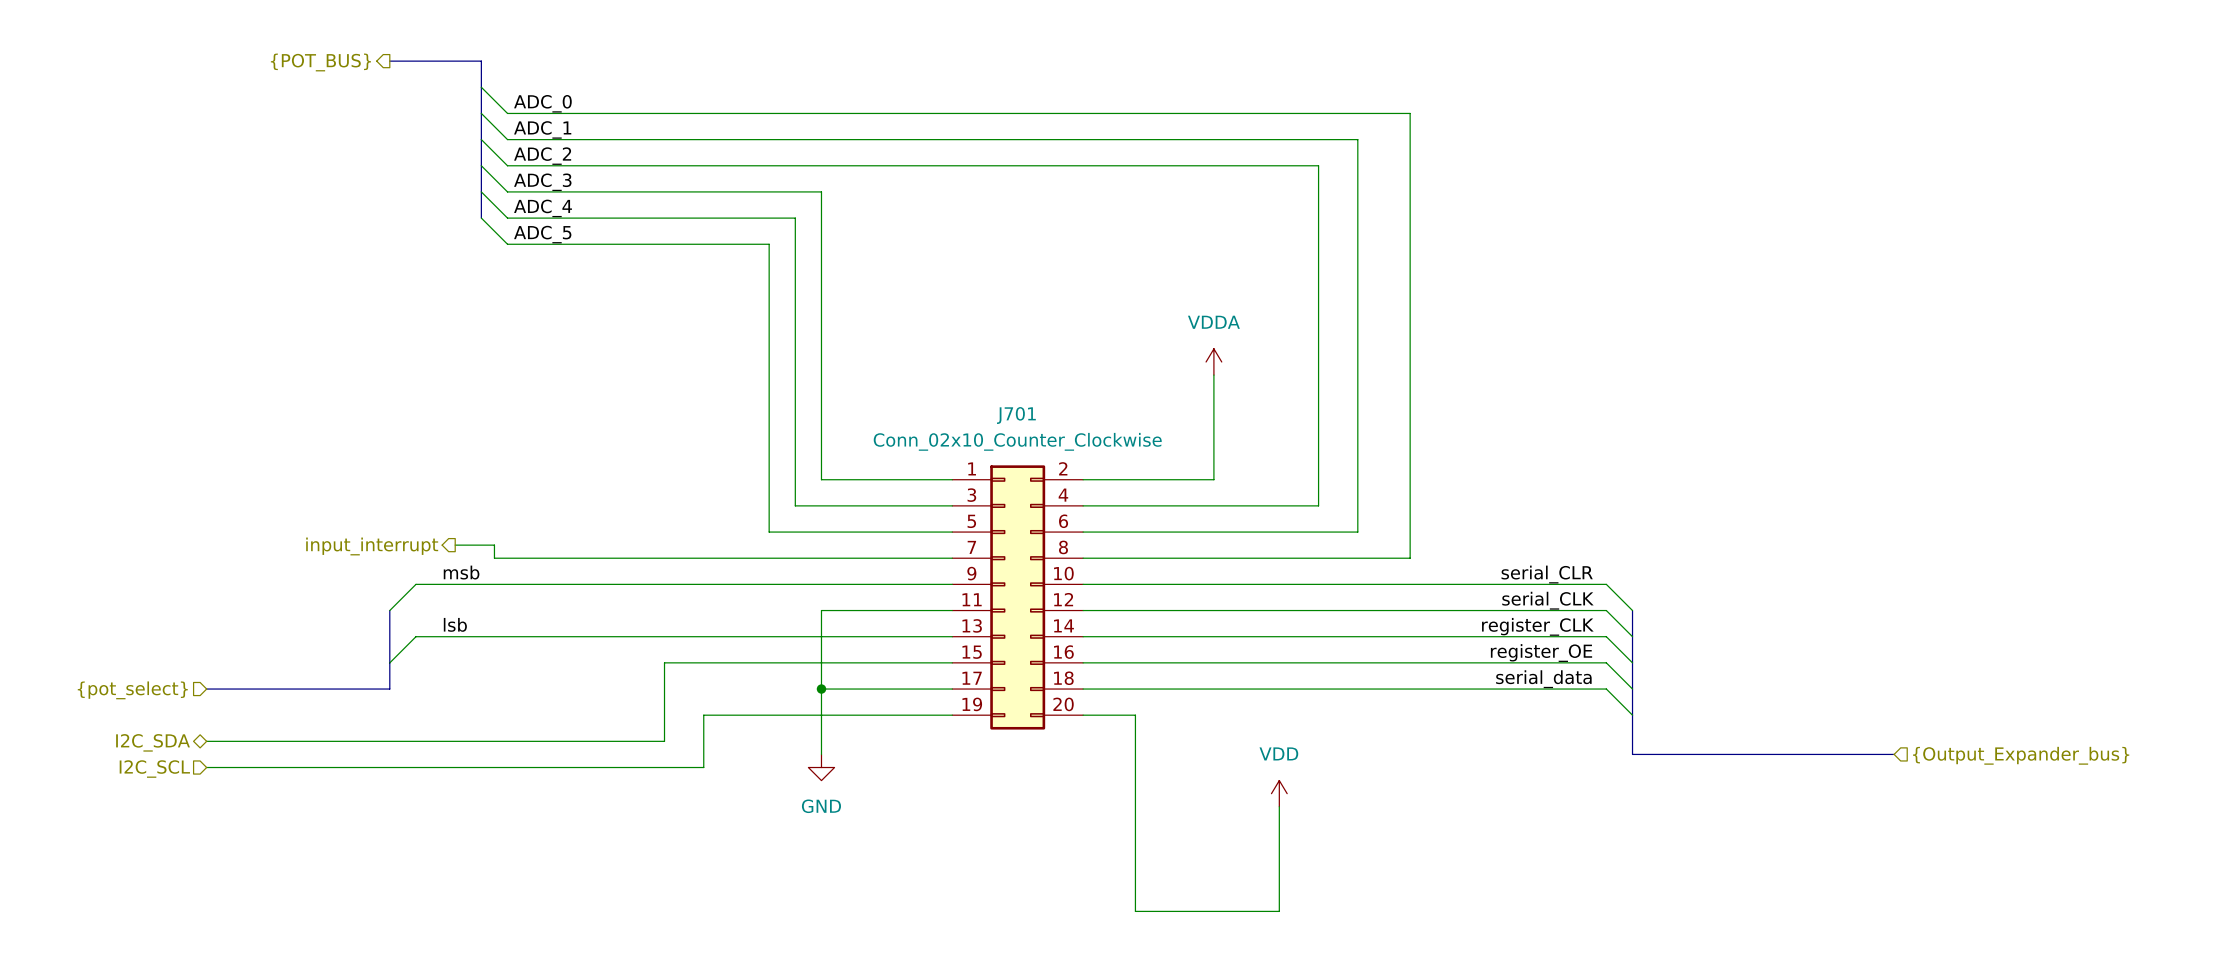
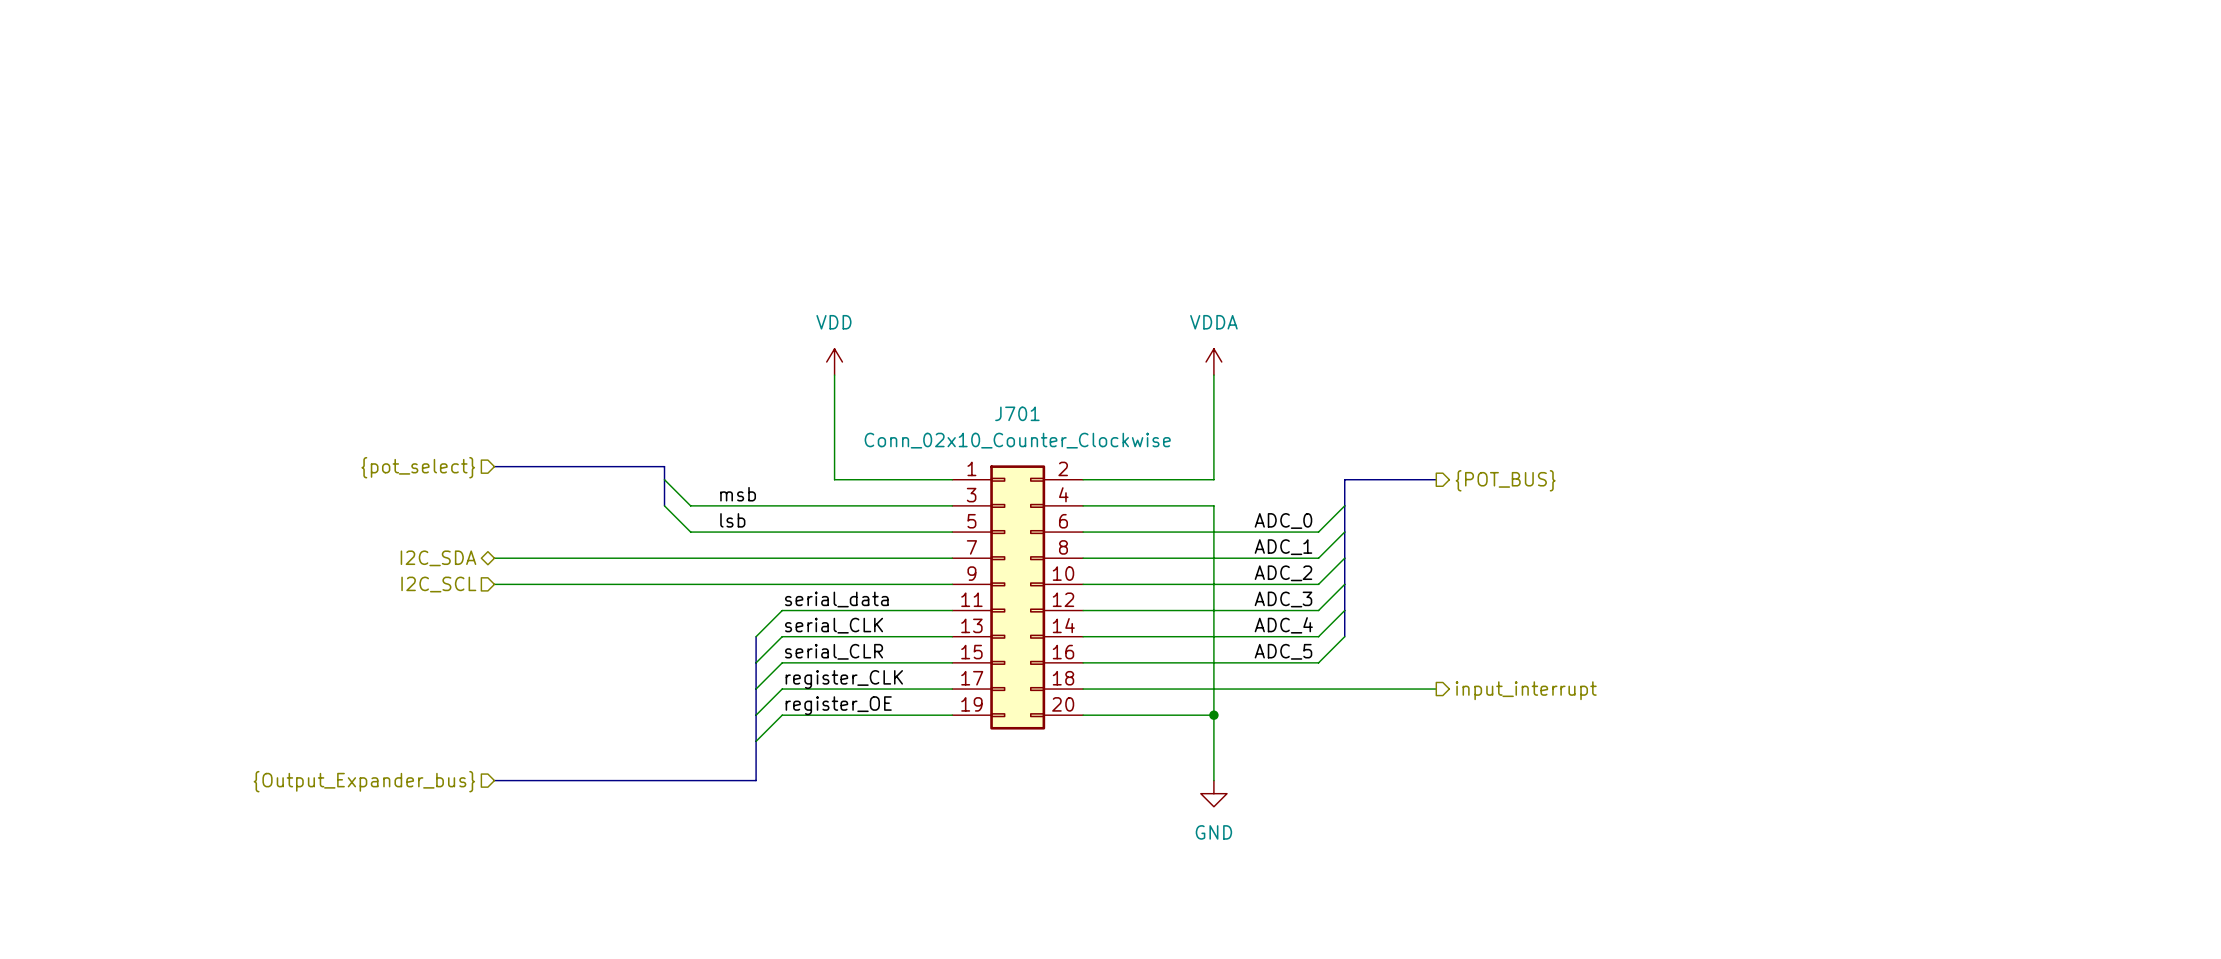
bus: (389, 61) (481, 61) (481, 218) -> none
hierarchical label: {POT_BUS} (320, 62) -> none
wire: (481, 87) (507, 113) (1410, 113) (1410, 558) (1318, 558) -> (1344, 532) (1318, 558)
label: ADC_0 (542, 103) -> none
wire: (481, 113) (507, 139) (1357, 139) (1357, 532) (1318, 532) -> (1344, 505) (1318, 532)
label: ADC_1 (542, 129) -> none
wire: (481, 139) (507, 165) (1318, 165) (1318, 505) (1213, 505) -> (1213, 780) (1213, 505)
label: ADC_2 (542, 156) -> none
wire: (481, 165) (507, 191) (821, 191) (821, 479) (834, 479) -> (834, 375) (834, 479)
label: ADC_3 (542, 182) -> none
wire: (481, 191) (507, 218) (795, 218) (795, 505) -> (664, 479) (690, 505) (795, 505)
label: ADC_4 (543, 208) -> none
wire: (481, 218) (507, 244) (769, 244) (769, 532) -> (664, 505) (690, 532) (769, 532)
label: ADC_5 (542, 234) -> none
power symbol: none -> VDD (834, 361)
bus: none -> (494, 466) (664, 466) (664, 505)
hierarchical label: none -> {pot_select} (418, 467)
bus: none -> (1436, 479) (1344, 479) (1344, 636)
hierarchical label: none -> {POT_BUS} (1505, 480)
label: none -> msb (738, 494)
label: none -> lsb (732, 520)
label: none -> ADC_0 (1283, 521)
wire: (455, 545) (494, 545) (494, 558) -> none
hierarchical label: input_interrupt (372, 546) -> none
label: none -> ADC_1 (1283, 547)
hierarchical label: none -> I2C_SDA (438, 558)
label: msb (461, 572) -> none
label: none -> ADC_2 (1283, 573)
label: serial_CLR (1547, 574) -> none
wire: (494, 584) (415, 584) (389, 610) -> none
wire: (1318, 584) (1606, 584) (1632, 610) -> (1318, 584) (1344, 558)
hierarchical label: none -> I2C_SCL (438, 584)
label: none -> serial_data (836, 599)
label: none -> ADC_3 (1283, 599)
label: serial_CLK (1547, 600) -> none
bus: (389, 610) (389, 689) (206, 689) -> none
wire: (821, 610) (821, 754) -> (821, 610) (782, 610) (756, 636)
wire: (1318, 610) (1606, 610) (1632, 636) -> (1318, 610) (1344, 584)
bus: (1632, 610) (1632, 754) (1894, 754) -> none
label: lsb (455, 624) -> none
label: none -> serial_CLK (834, 625)
label: register_CLK (1537, 626) -> none
label: none -> ADC_4 (1283, 625)
bus: none -> (756, 636) (756, 780) (494, 780)
wire: (782, 636) (415, 636) (389, 662) -> (782, 636) (756, 662)
wire: (1318, 636) (1606, 636) (1632, 662) -> (1318, 636) (1344, 610)
label: none -> serial_CLR (834, 651)
label: none -> ADC_5 (1283, 651)
label: register_OE (1541, 653) -> none
wire: (782, 662) (664, 662) (664, 741) (206, 741) -> (782, 662) (756, 689)
wire: (1318, 662) (1606, 662) (1632, 689) -> (1318, 662) (1344, 636)
label: none -> register_CLK (844, 679)
label: serial_data (1543, 679) -> none
wire: none -> (821, 689) (782, 689) (756, 715)
junction: (821, 689) -> none
wire: (1436, 689) (1606, 689) (1632, 715) -> none
hierarchical label: {pot_select} (132, 690) -> none
hierarchical label: none -> input_interrupt (1526, 690)
label: none -> register_OE (838, 705)
wire: (782, 715) (703, 715) (703, 767) (206, 767) -> (782, 715) (756, 741)
wire: (1135, 715) (1135, 911) (1279, 911) (1279, 806) -> (1135, 715) (1213, 715)
junction: none -> (1213, 715)
hierarchical label: I2C_SDA (153, 742) -> none
hierarchical label: {Output_Expander_bus} (2021, 755) -> none
power symbol: GND (821, 767) -> none
hierarchical label: I2C_SCL (154, 769) -> none
hierarchical label: none -> {Output_Expander_bus} (364, 781)
power symbol: none -> GND (1213, 793)
power symbol: VDD (1279, 793) -> none

